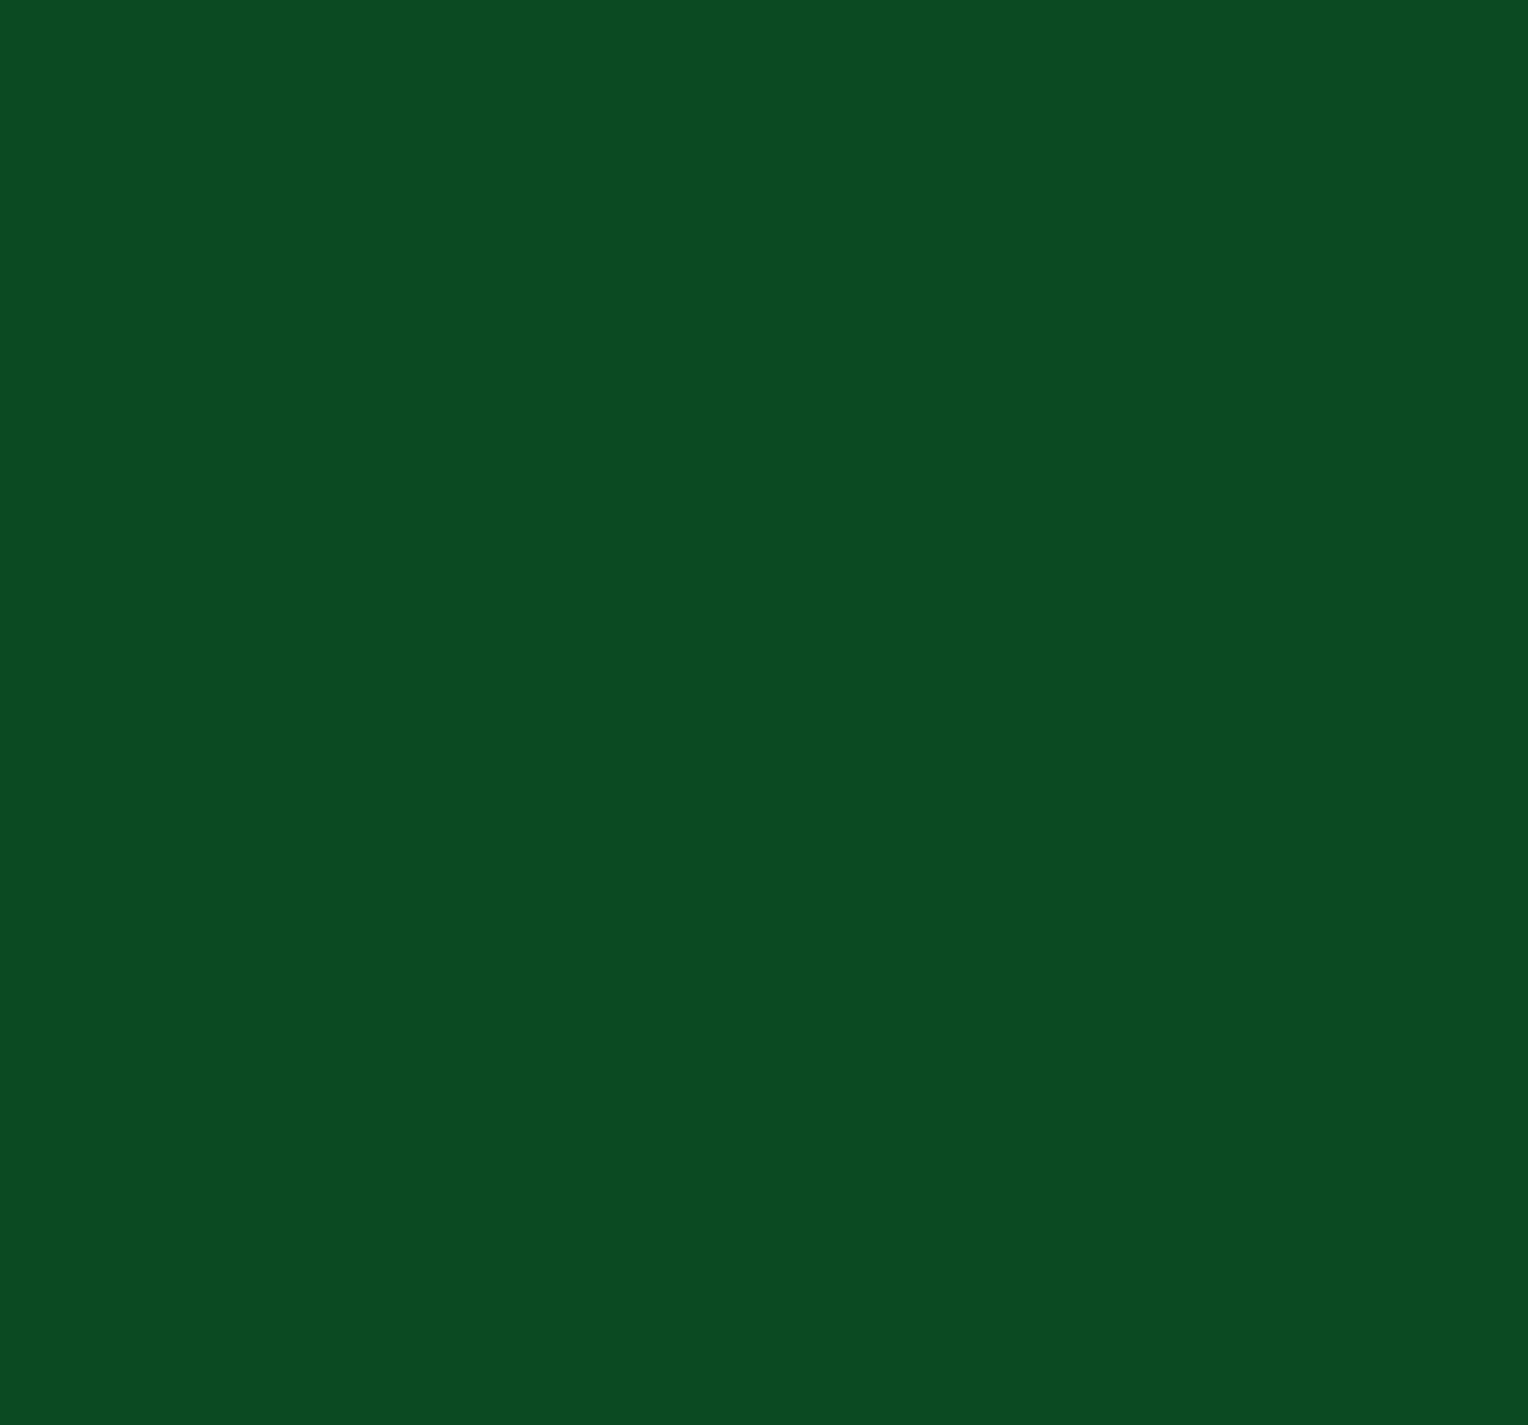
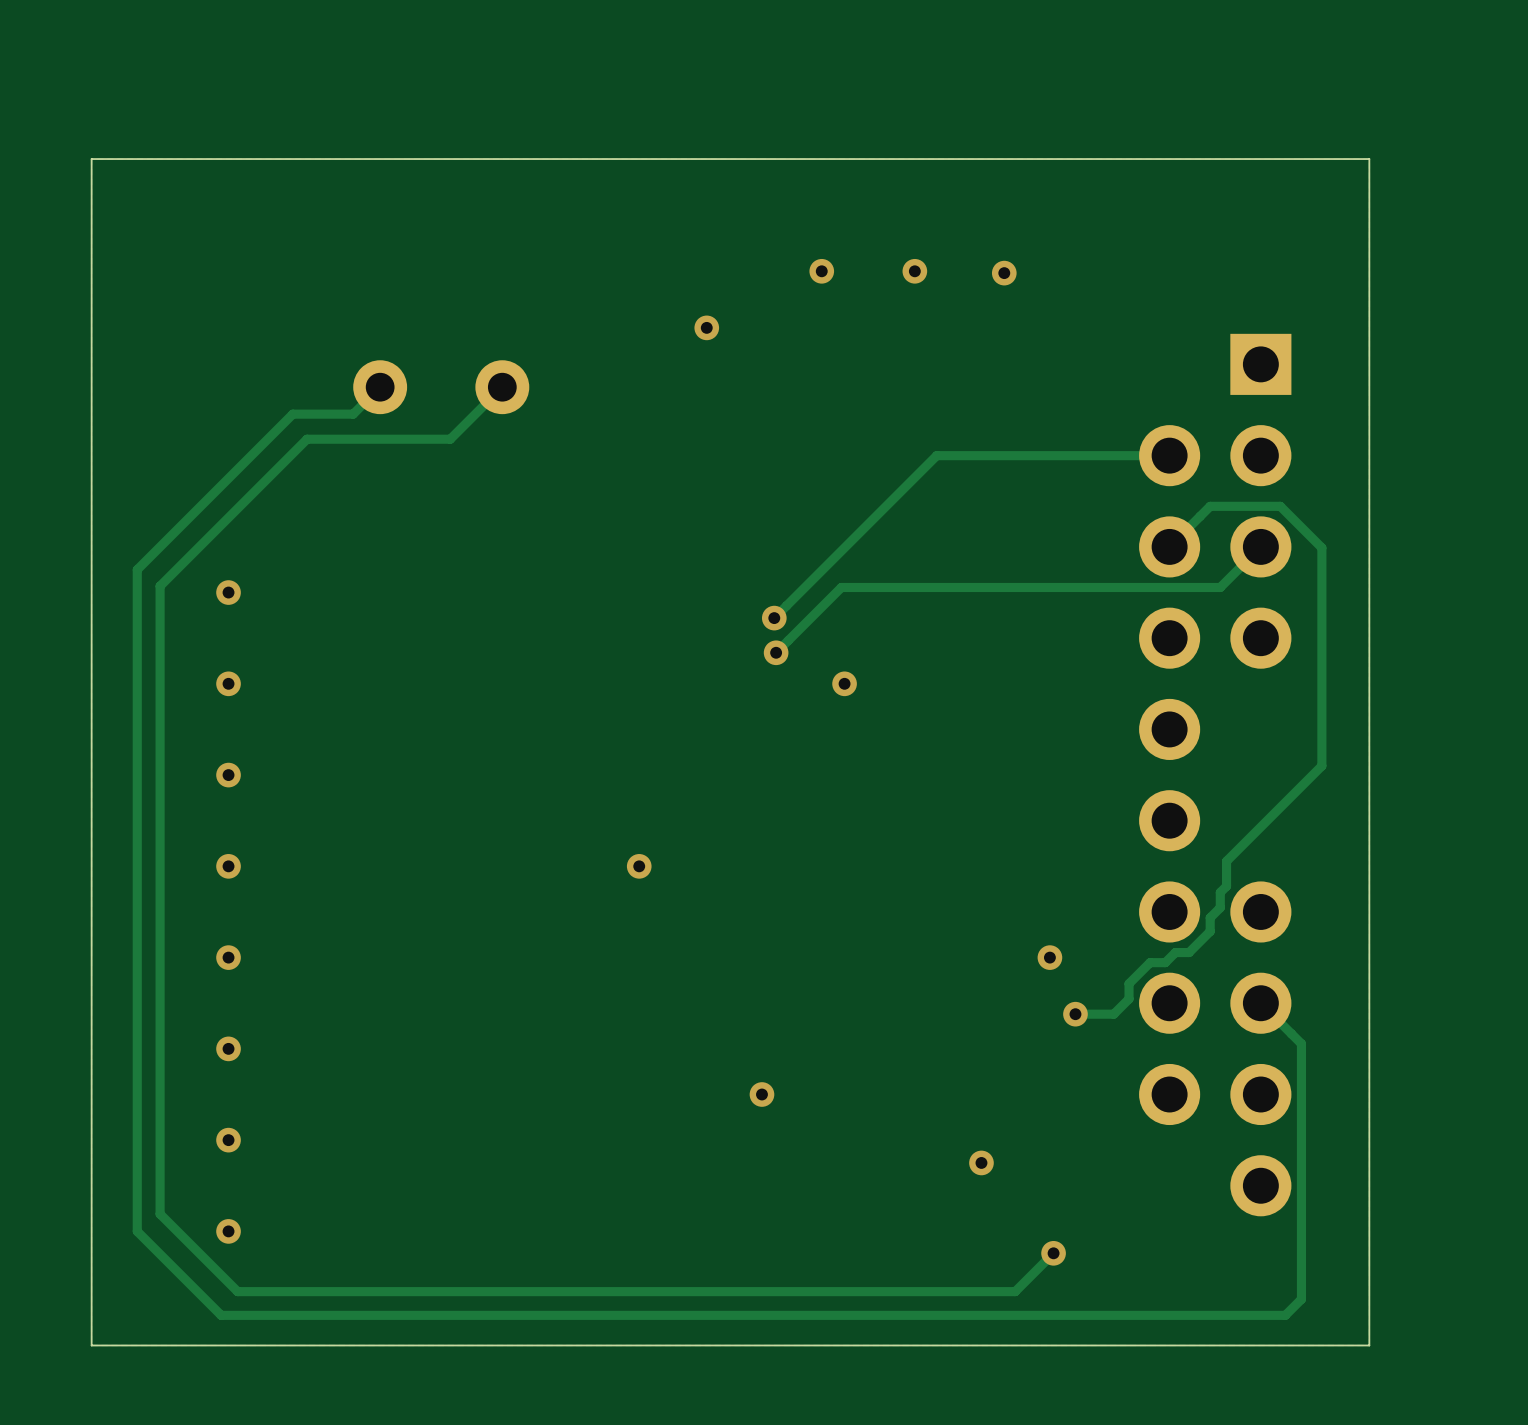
board edge: none -> (1369, 159) (1369, 1345) (91, 1345) (91, 159) (1369, 159)
via: none -> (821, 271)
via: none -> (914, 271)
via: none -> (1004, 273)
via: none -> (706, 327)
track: none -> (380, 387) (353, 414) (292, 414) (137, 569) (137, 1231) (221, 1315) (1285, 1315) (1301, 1299) (1301, 1043) (1260, 1003)
part: none -> (441, 387)
track: none -> (502, 387) (450, 439) (307, 439) (160, 586) (160, 1214) (237, 1291) (1015, 1291) (1053, 1253)
track: none -> (1169, 455) (936, 455) (774, 618)
track: none -> (1169, 546) (1210, 506) (1280, 506) (1321, 547) (1321, 765) (1226, 861) (1226, 886) (1220, 892) (1220, 907) (1210, 917) (1210, 931) (1189, 952) (1175, 952) (1165, 962) (1150, 962) (1129, 983) (1129, 998) (1113, 1014) (1075, 1014)
track: none -> (1260, 546) (1220, 587) (841, 587) (776, 652)
via: none -> (228, 592)
via: none -> (774, 618)
via: none -> (776, 652)
via: none -> (228, 683)
via: none -> (844, 683)
via: none -> (228, 775)
part: none -> (1215, 775)
via: none -> (228, 866)
via: none -> (639, 866)
via: none -> (228, 957)
via: none -> (1049, 957)
via: none -> (1075, 1014)
via: none -> (228, 1048)
via: none -> (761, 1094)
via: none -> (228, 1140)
via: none -> (981, 1162)
via: none -> (228, 1231)
via: none -> (1053, 1253)

